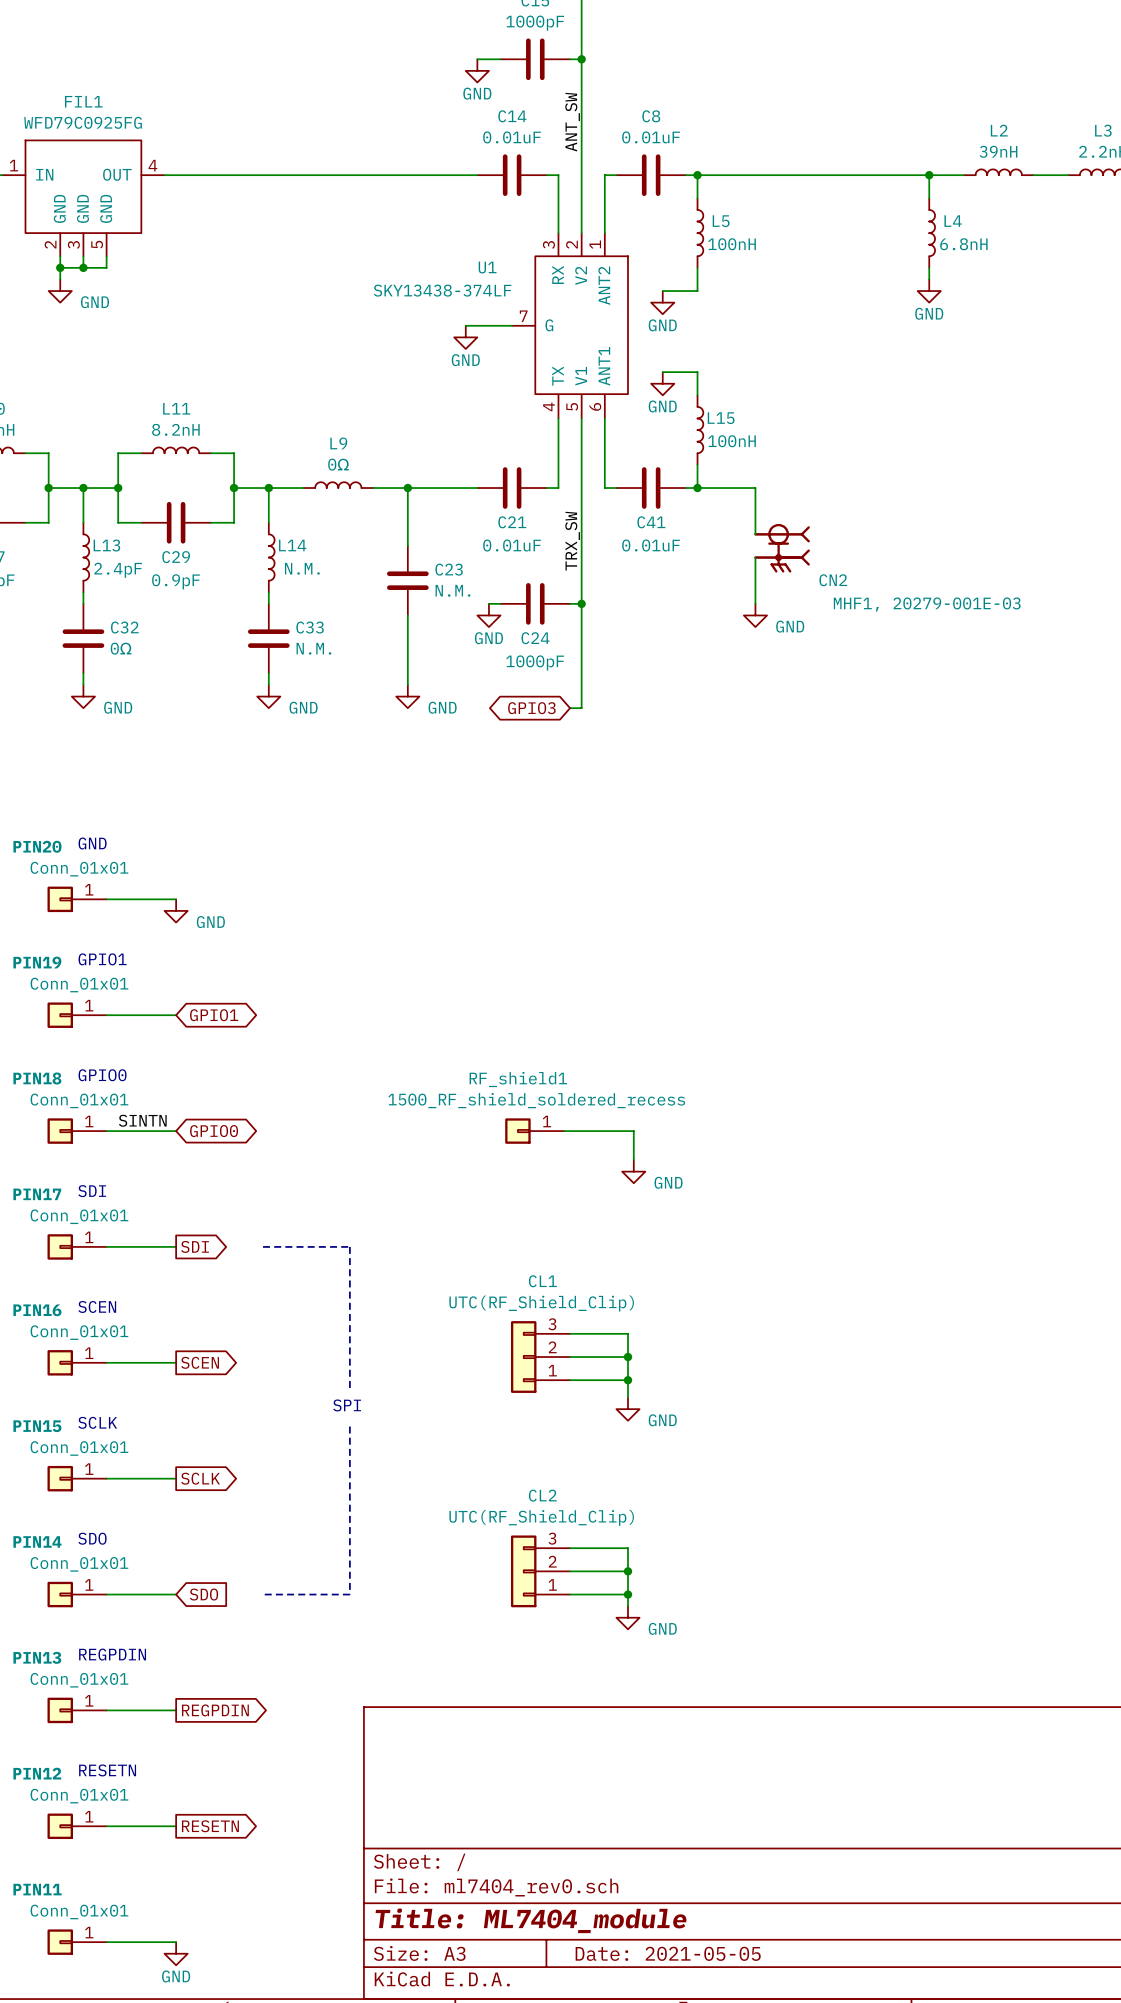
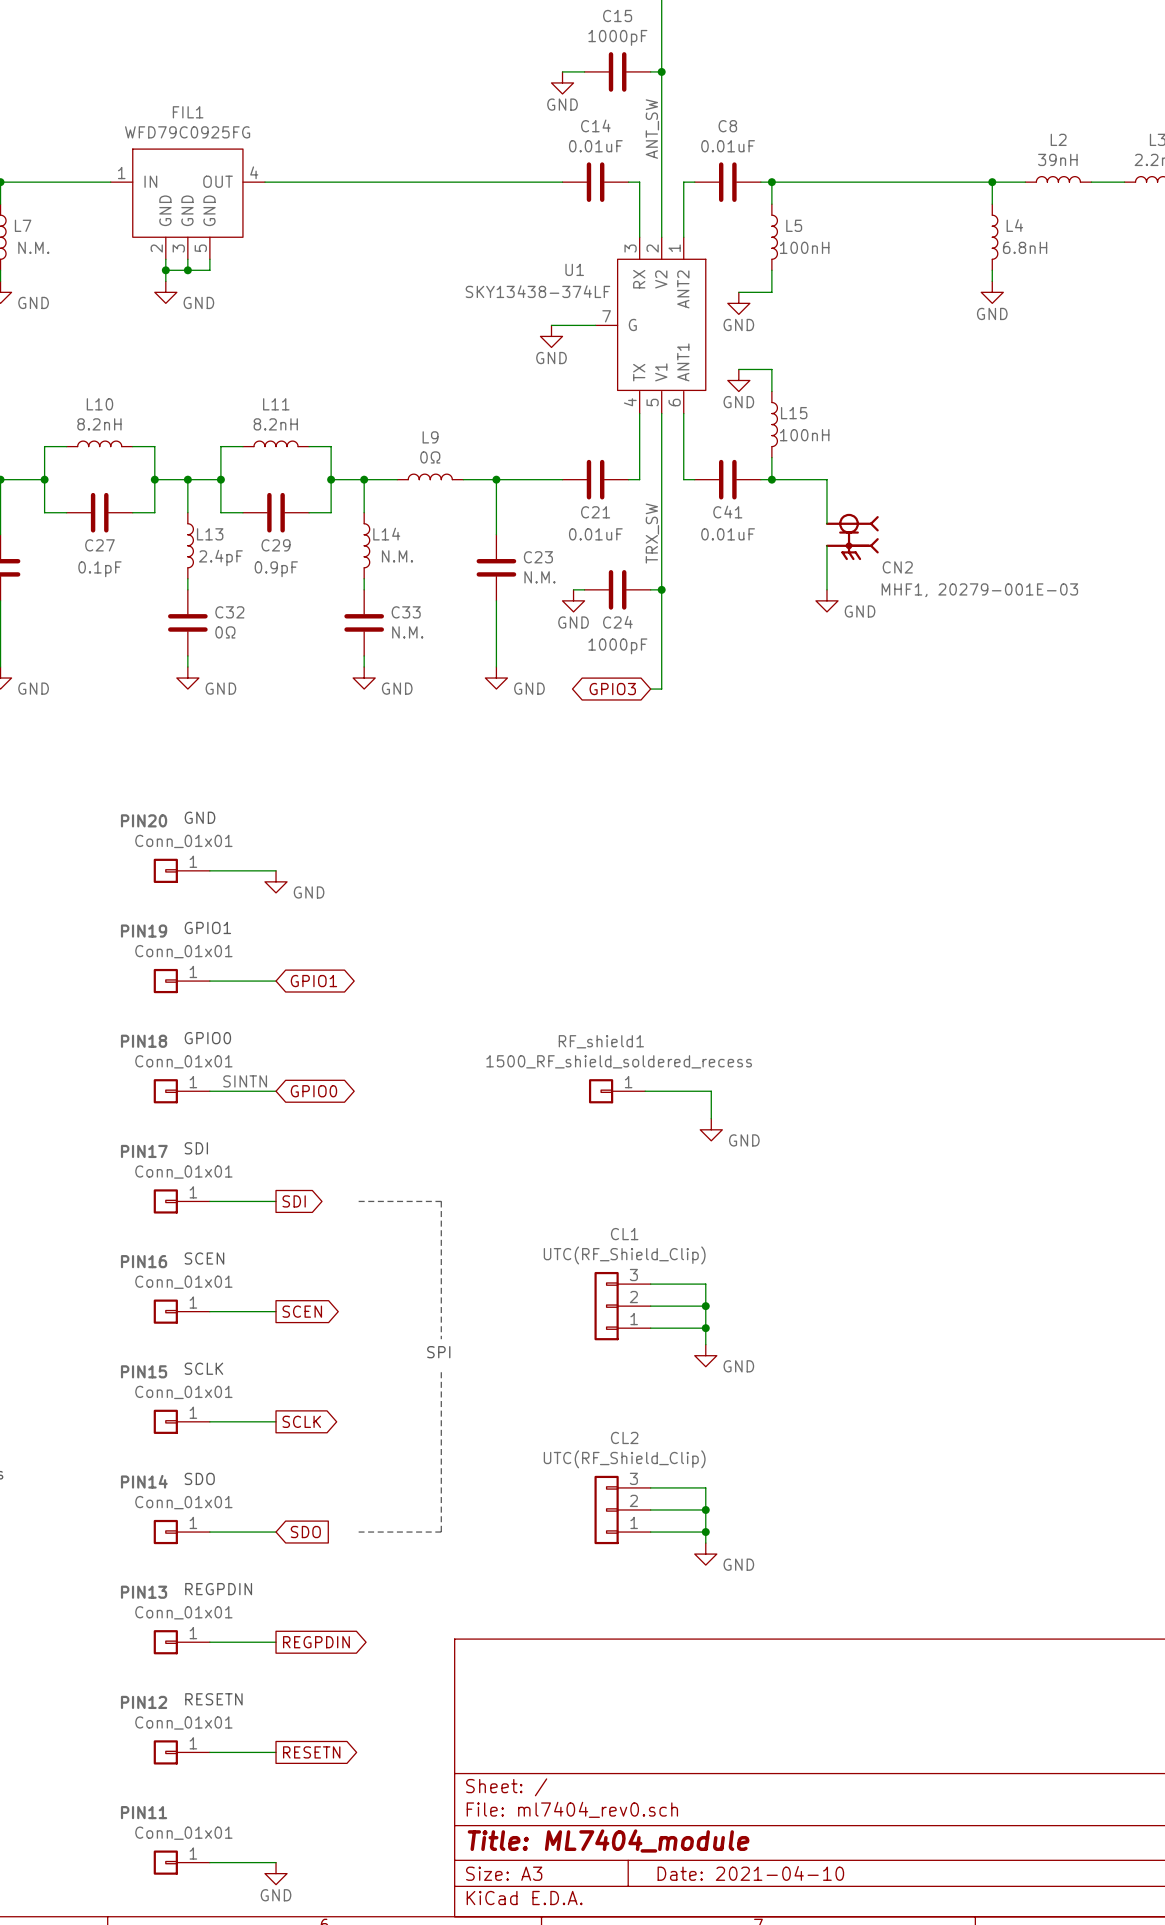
title block: Date: 2021-05-05 (668, 1953) -> Date: 2021-04-10 (750, 1873)

